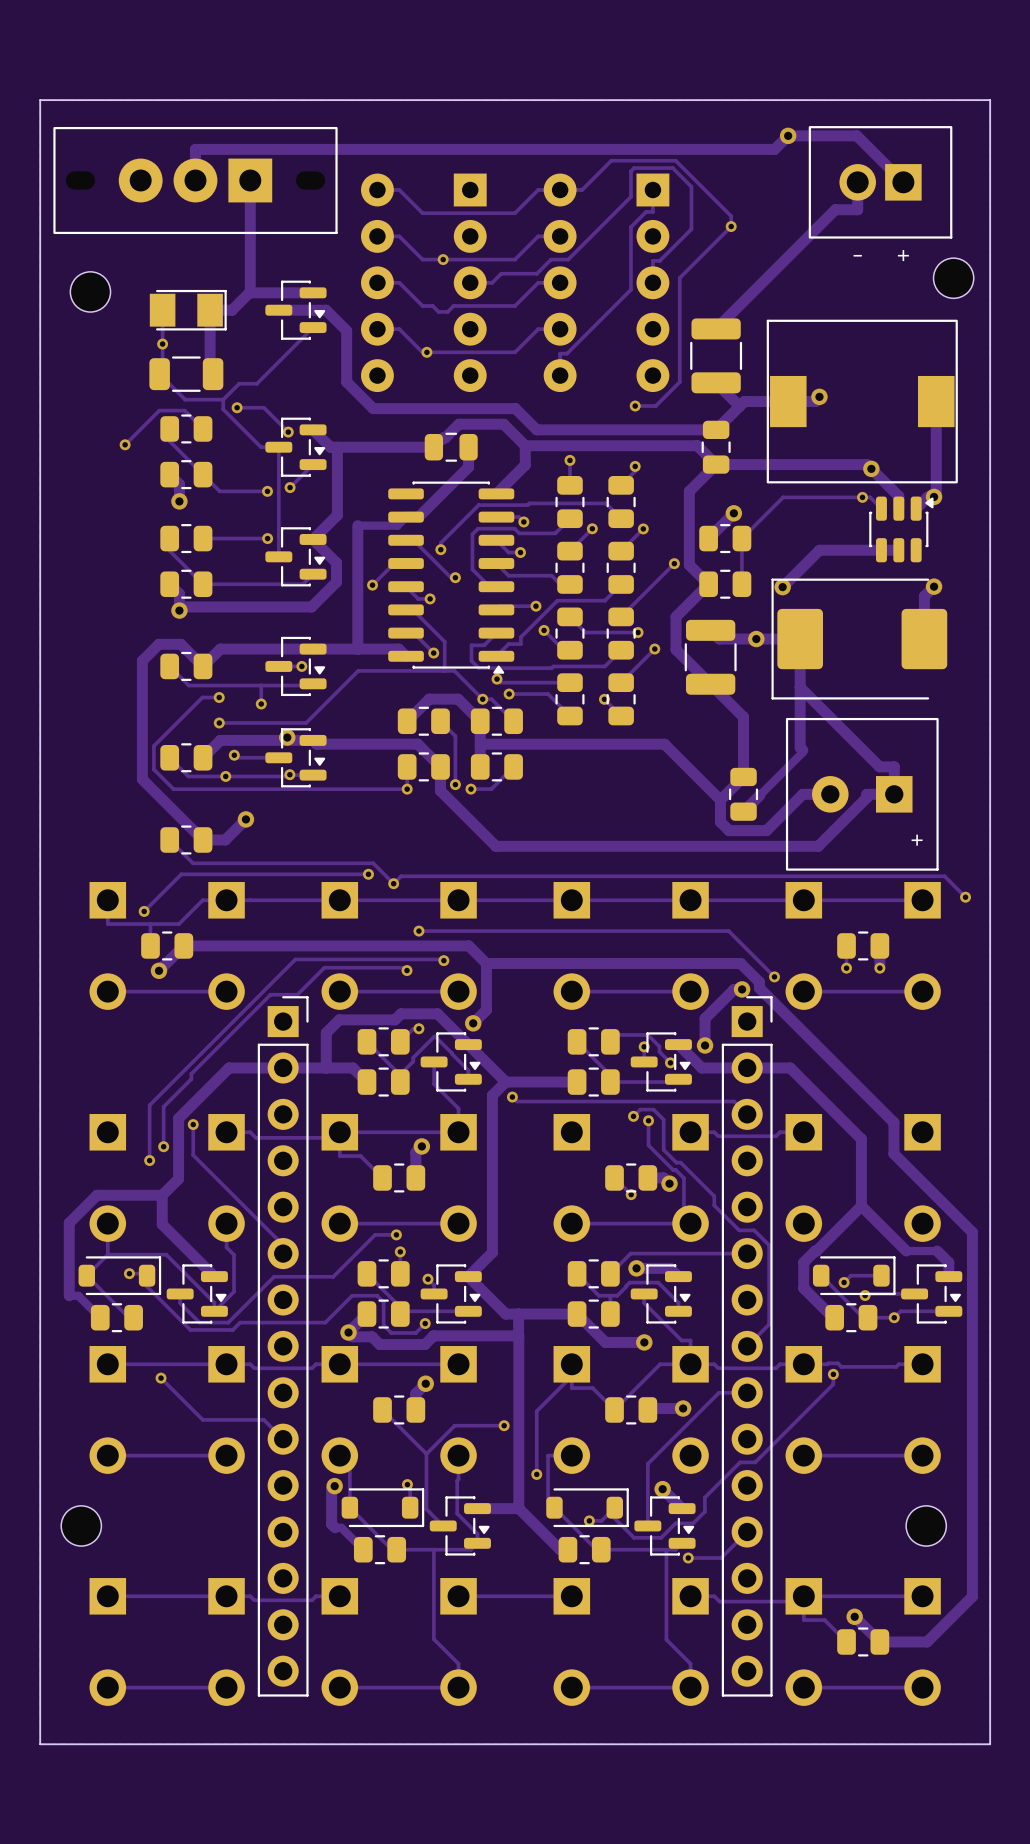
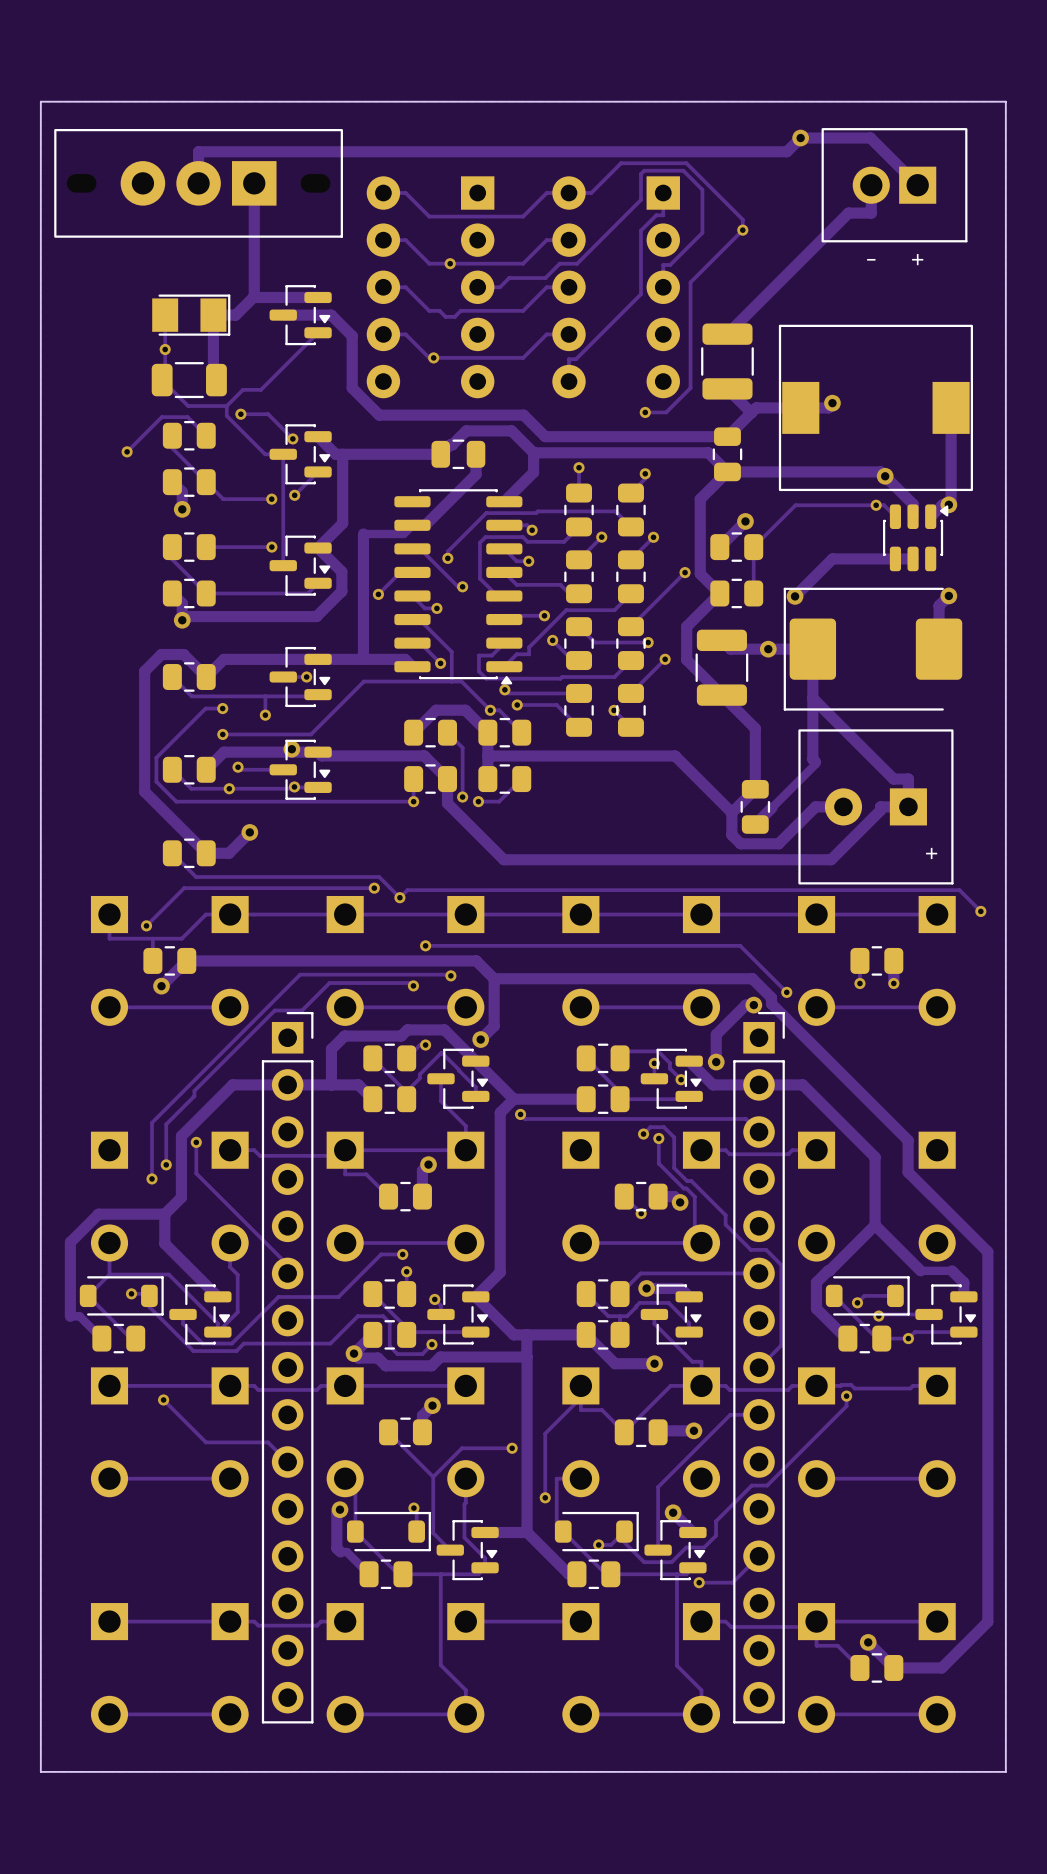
part: (953, 278) -> none
part: (90, 291) -> none
part: (81, 1525) -> none
part: (926, 1525) -> none

